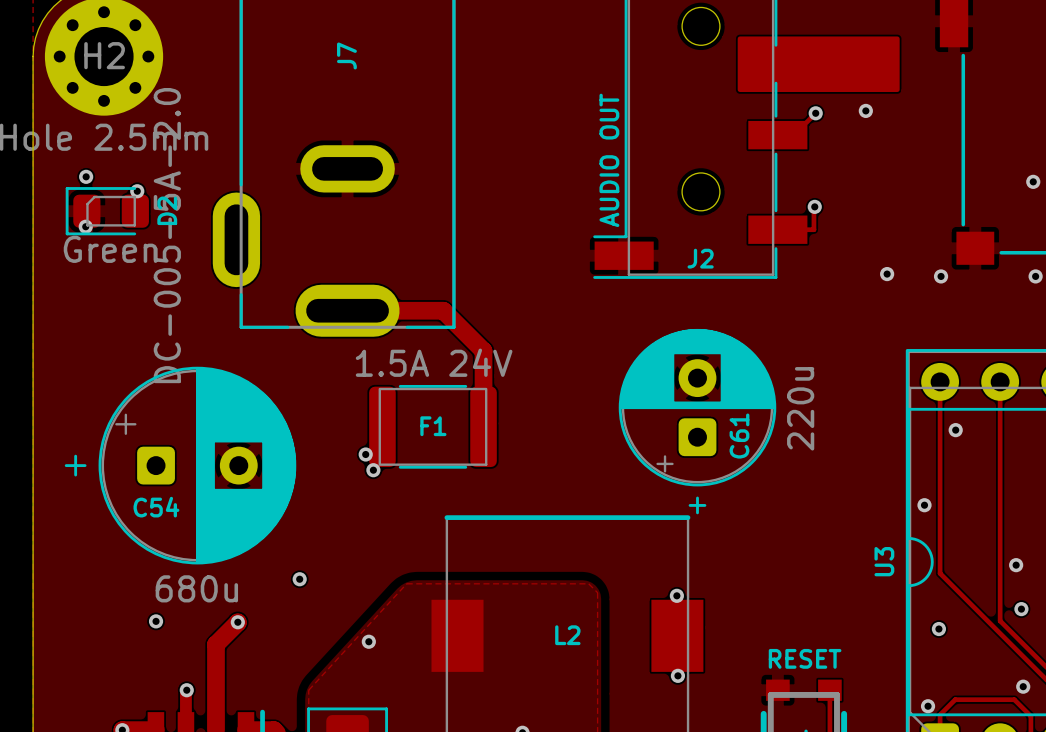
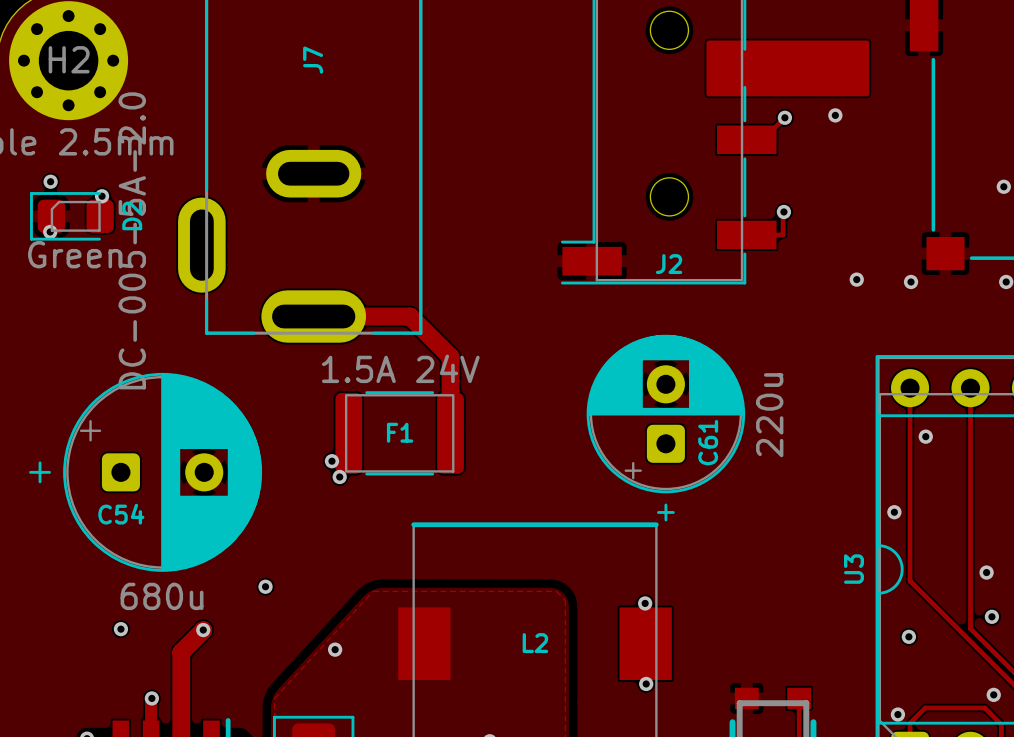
text: AUDIO OUT (609, 160) -> none
text: RESET (805, 658) -> none

